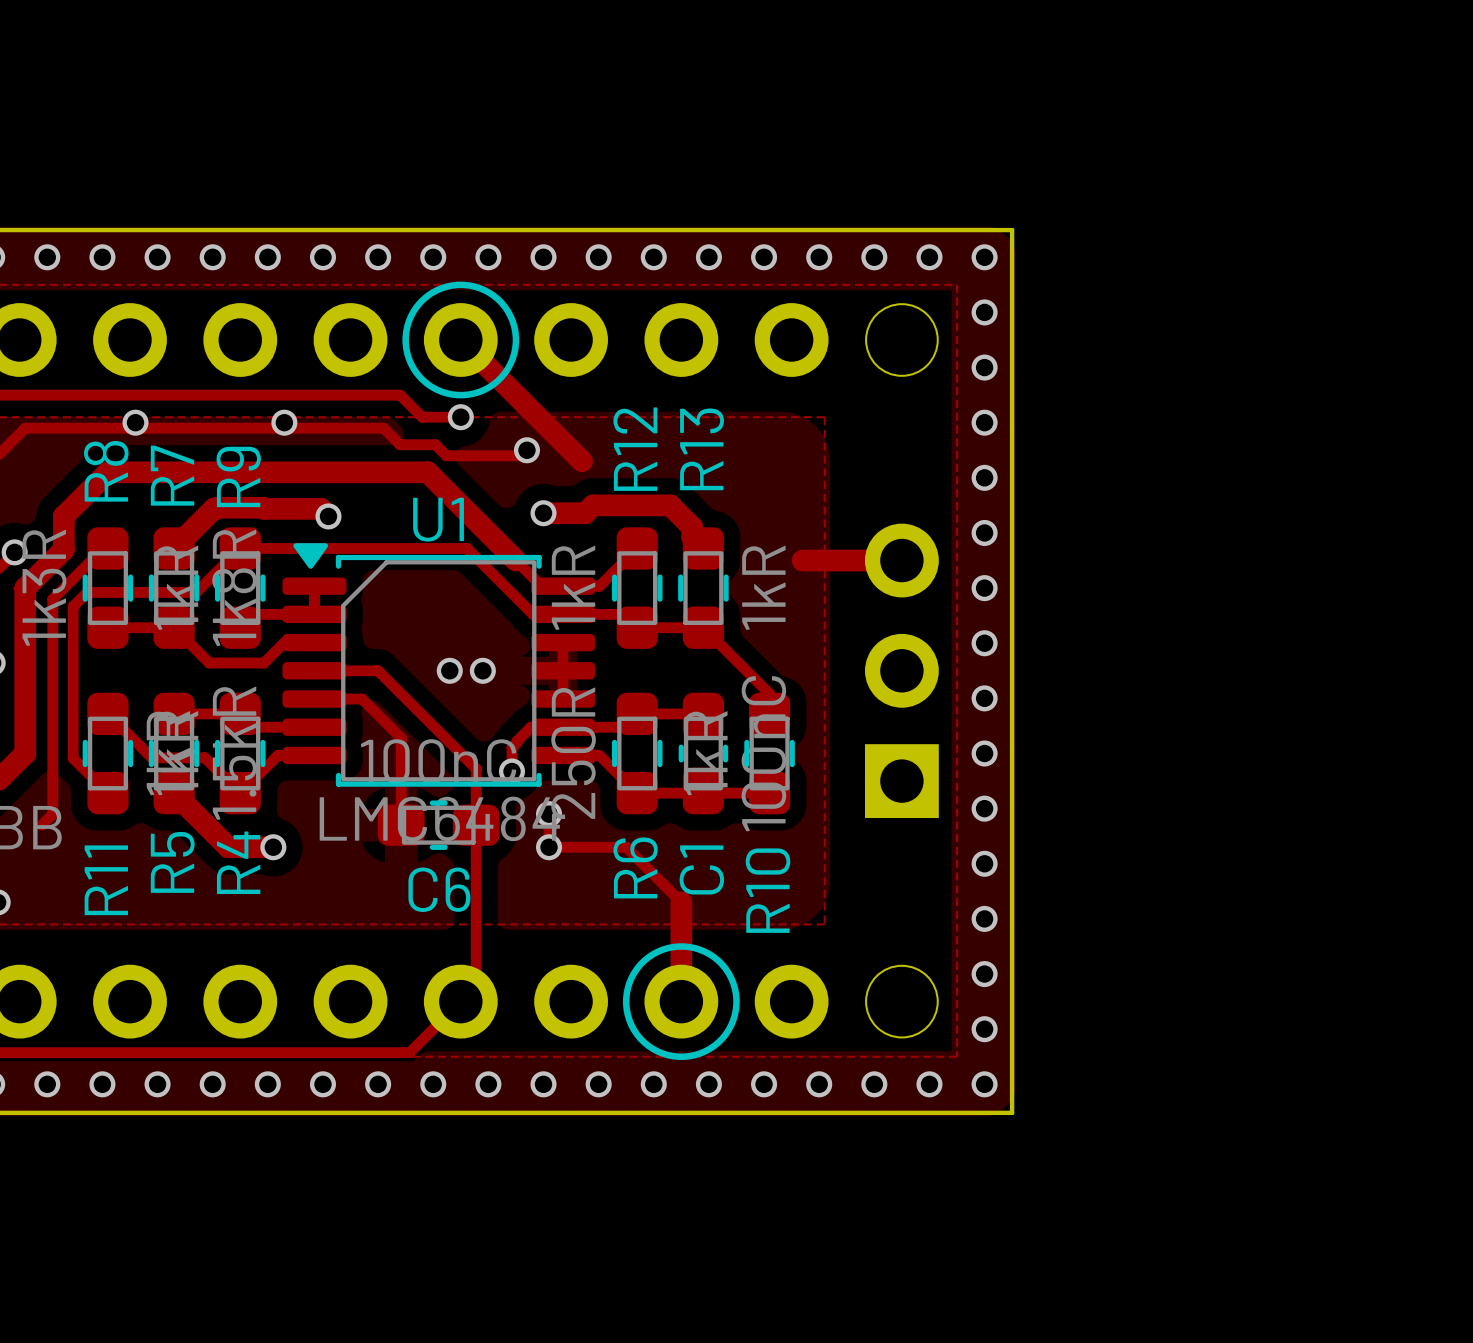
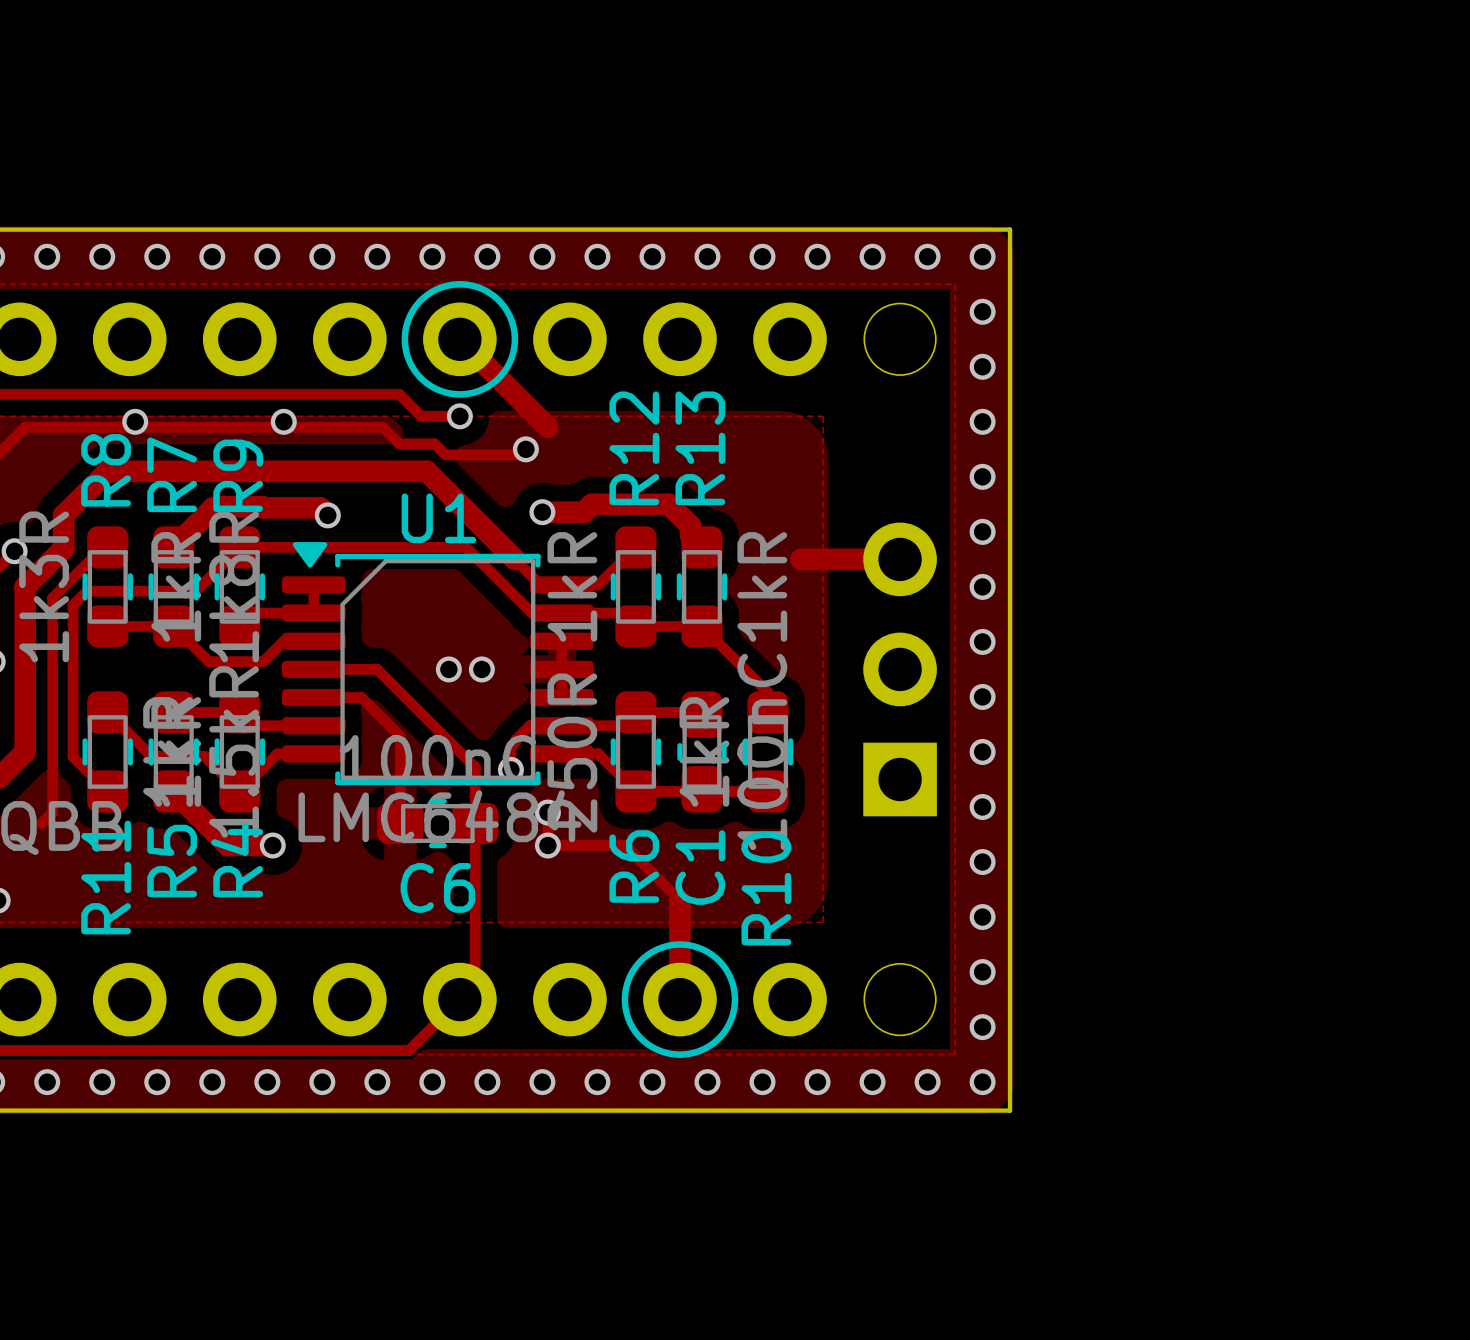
track: (549, 428) (582, 461) -> none

